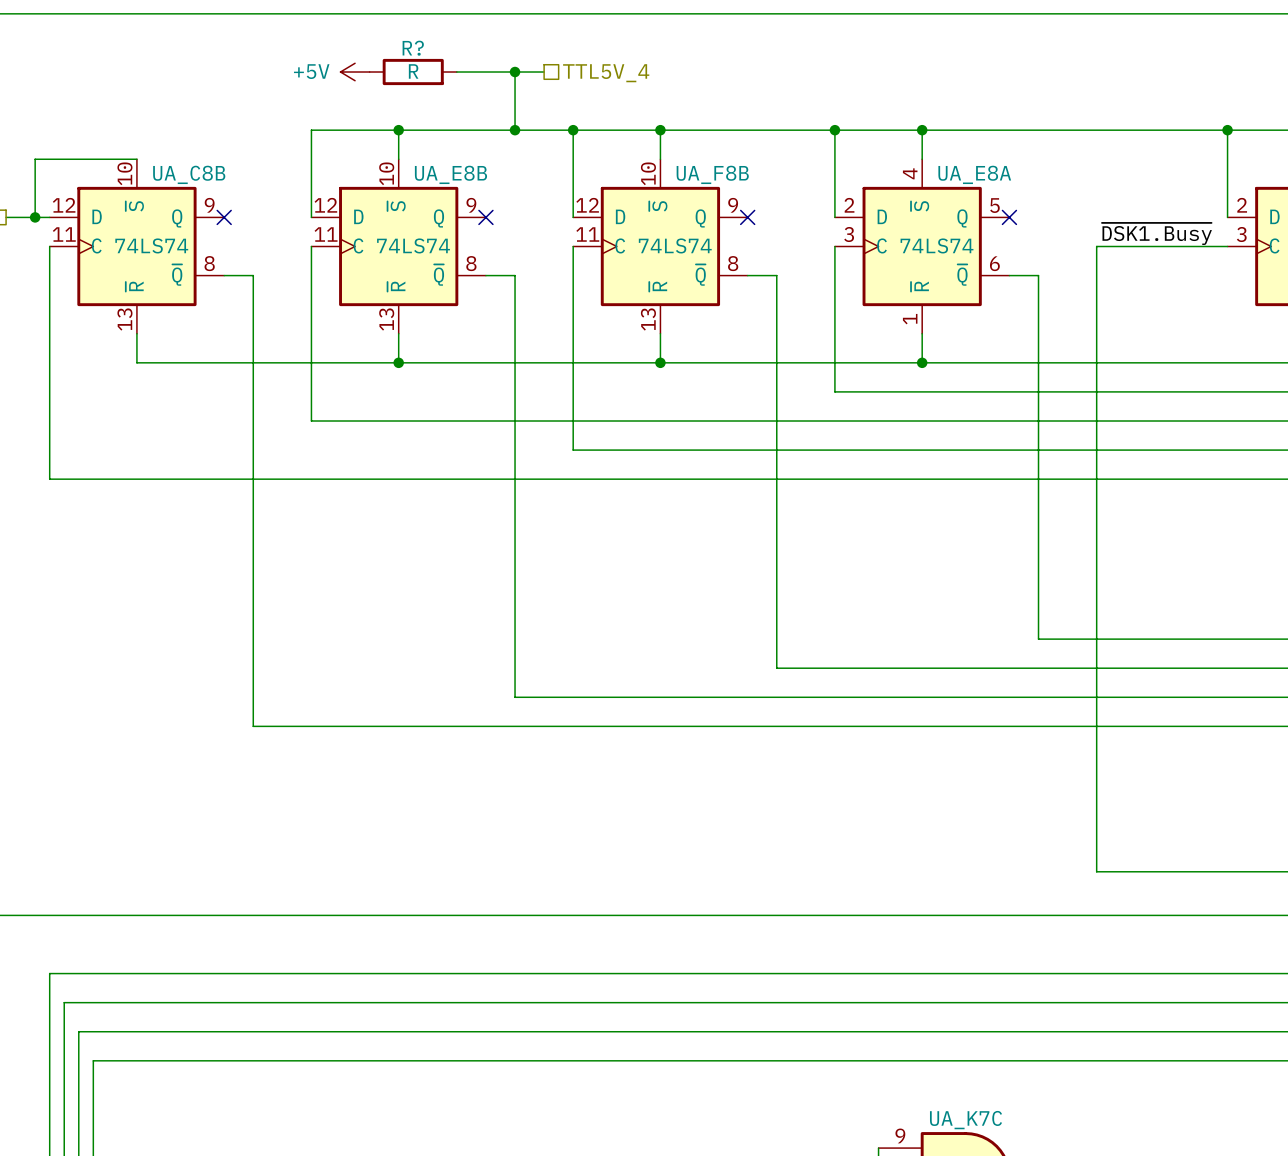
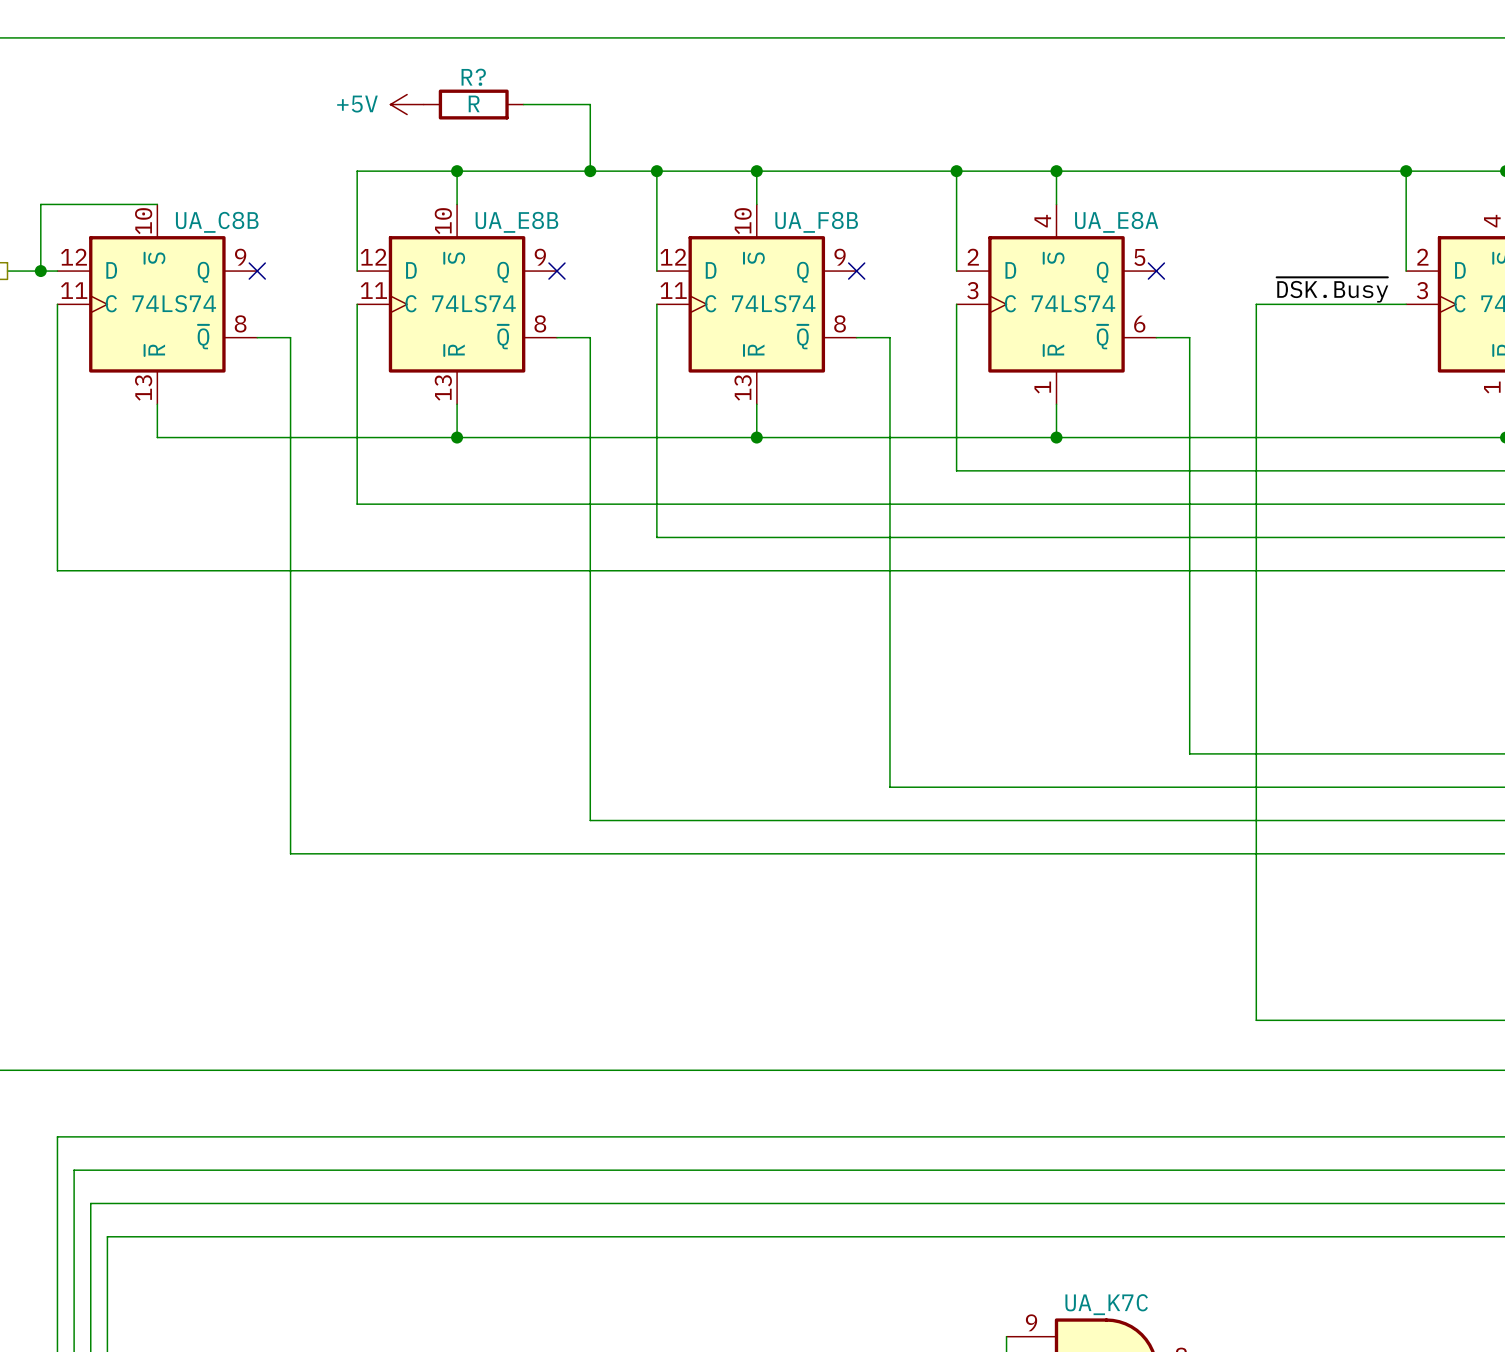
wire: (515, 72) (544, 72) -> none
junction: (515, 72) -> none
hierarchical label: TTL5V_4 (606, 73) -> none
label: ~{DSK1.Busy} (1156, 233) -> ~{DSK.Busy} (1332, 289)

